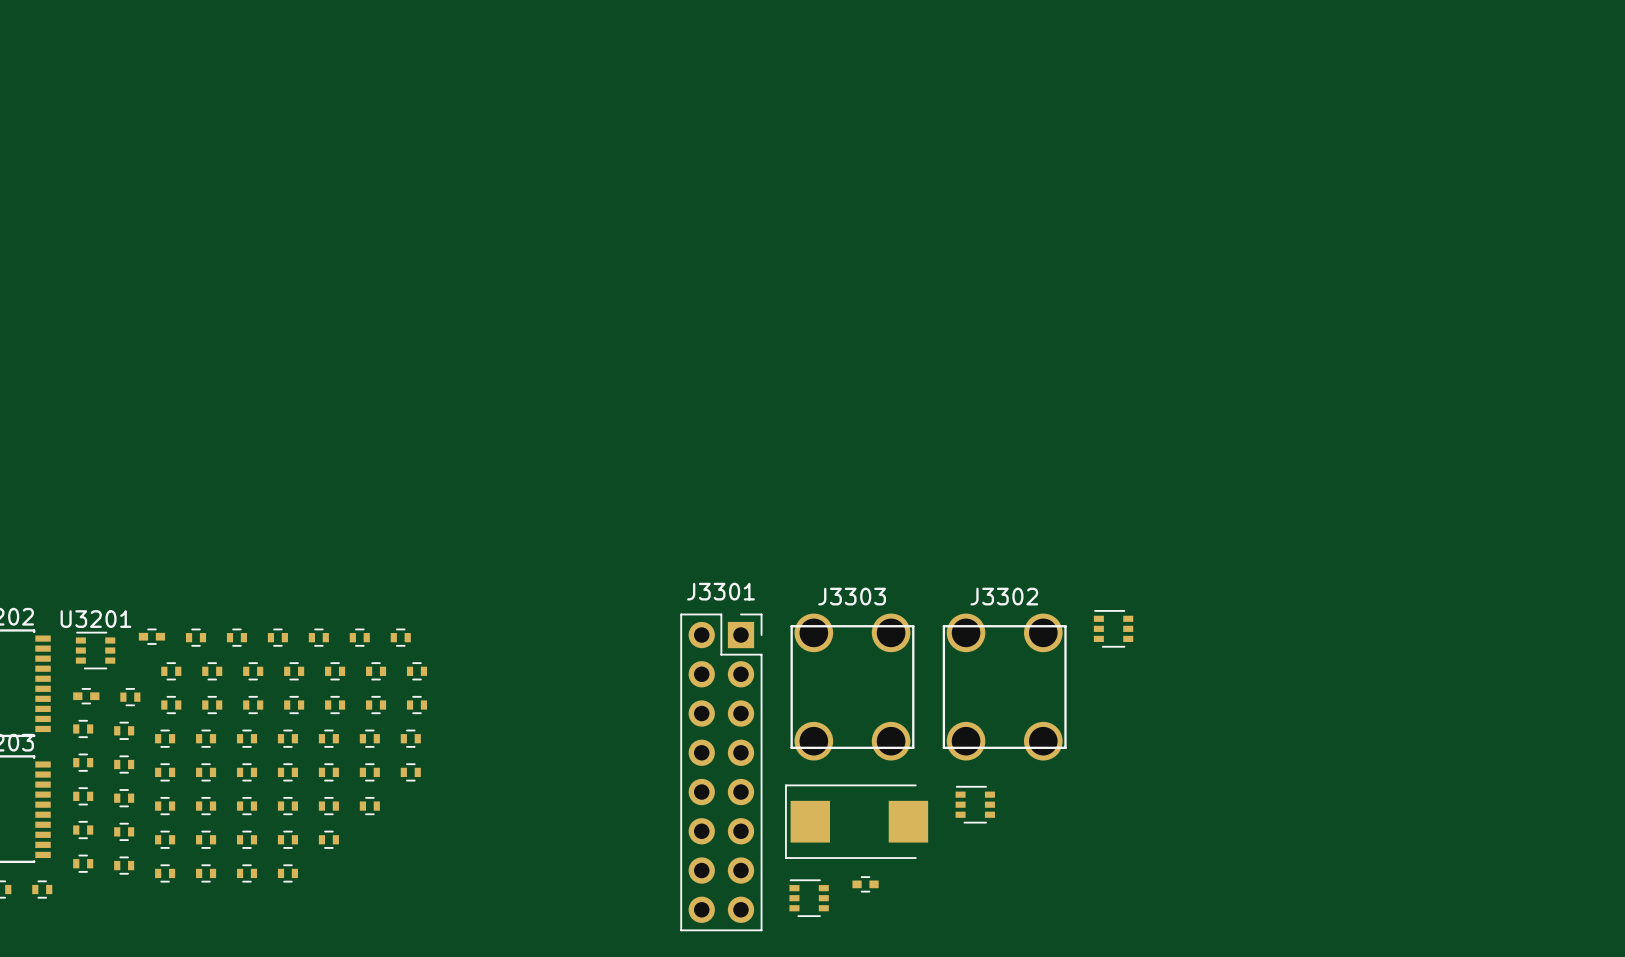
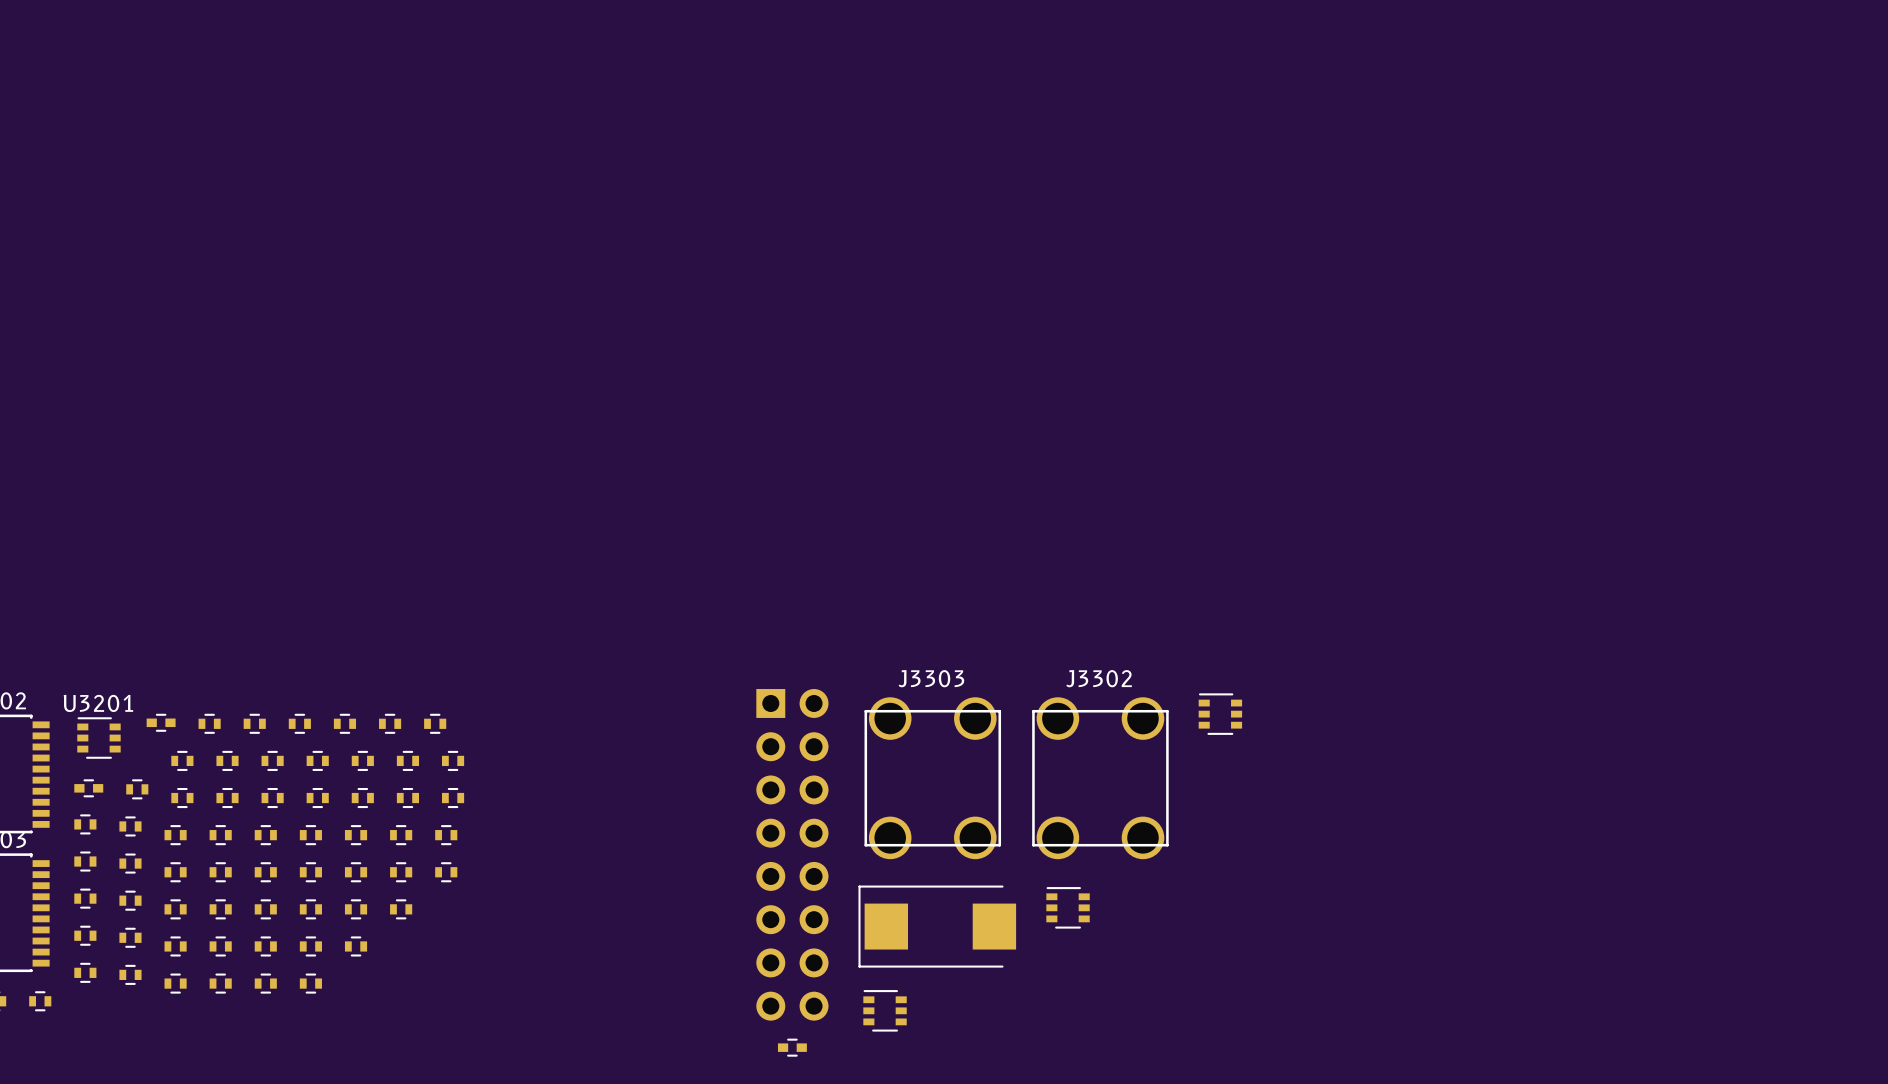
J3301 side: top (721, 772) -> bottom (792, 854)
part position: (865, 884) -> (792, 1047)

